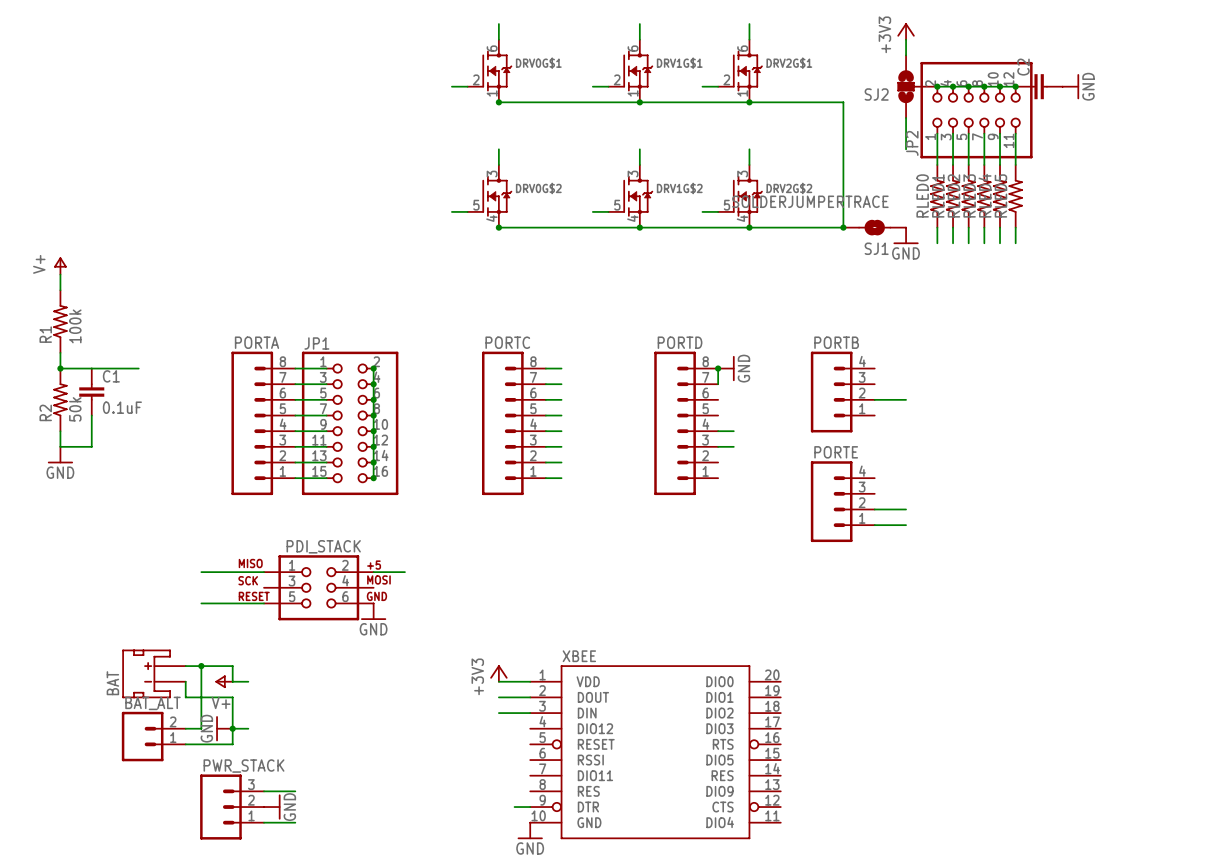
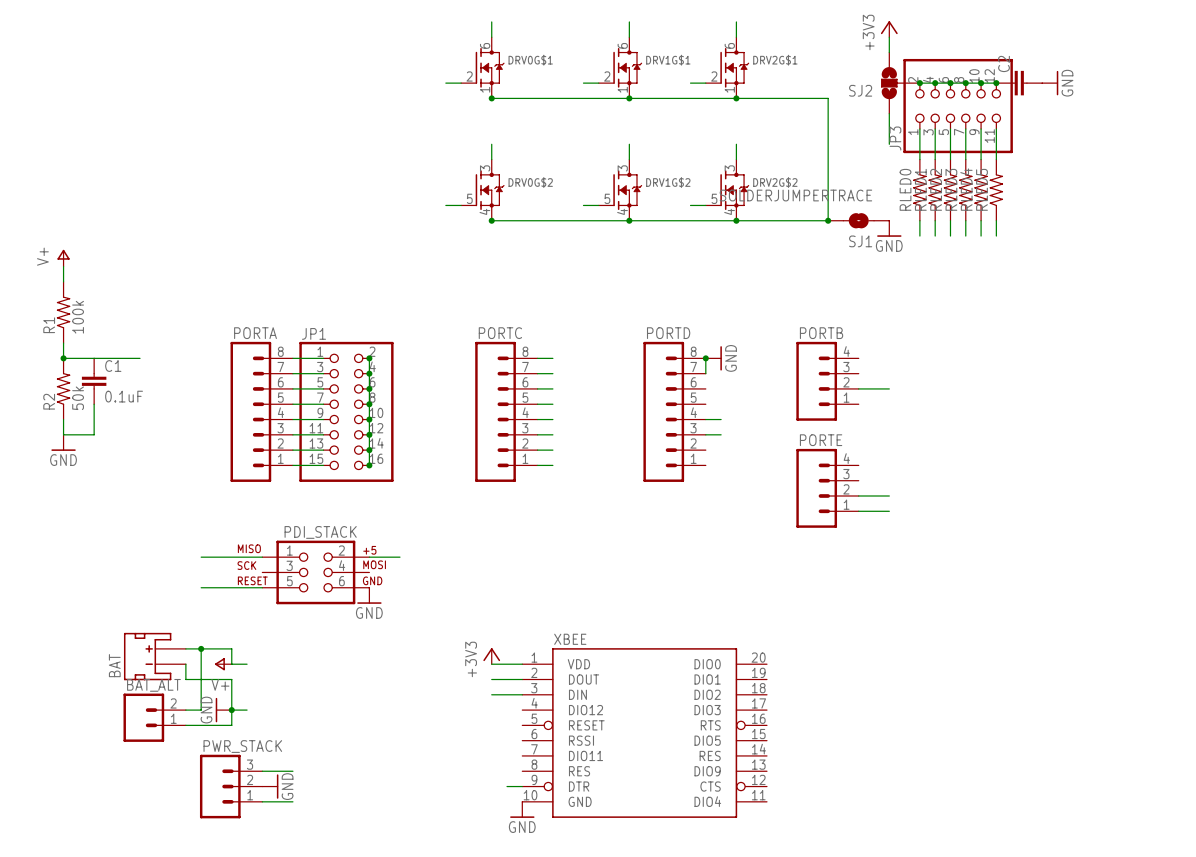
JP2 name: JP2 (912, 143) -> JP3 (895, 138)

